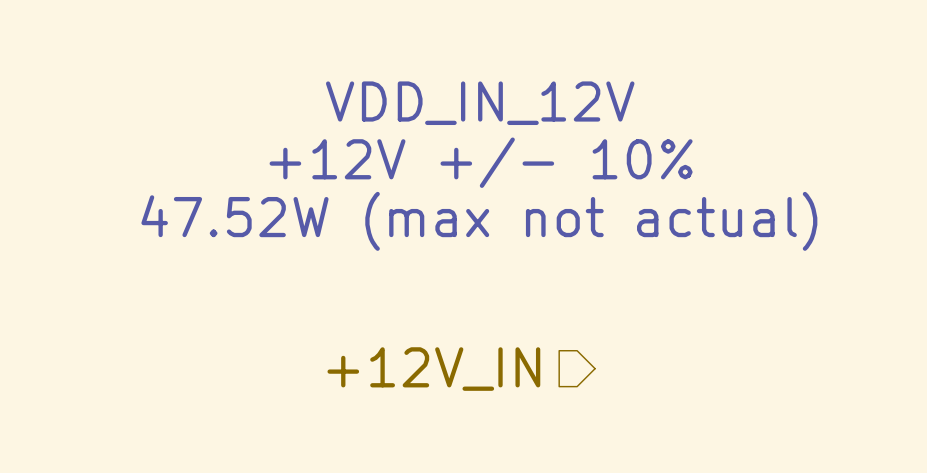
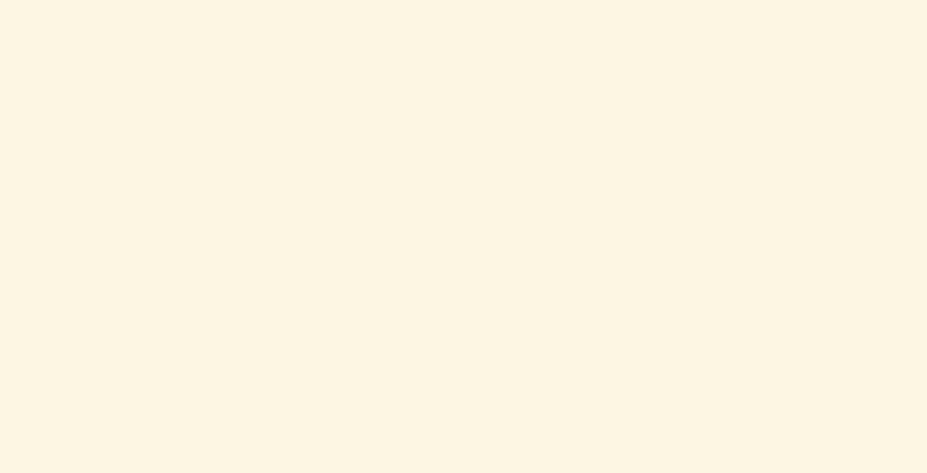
text: VDD_IN_12V (480, 103) -> none
text: +12V +/- 10% (481, 162) -> none
text: 47.52W (max not actual) (479, 221) -> none
hierarchical label: +12V_IN (433, 369) -> none

